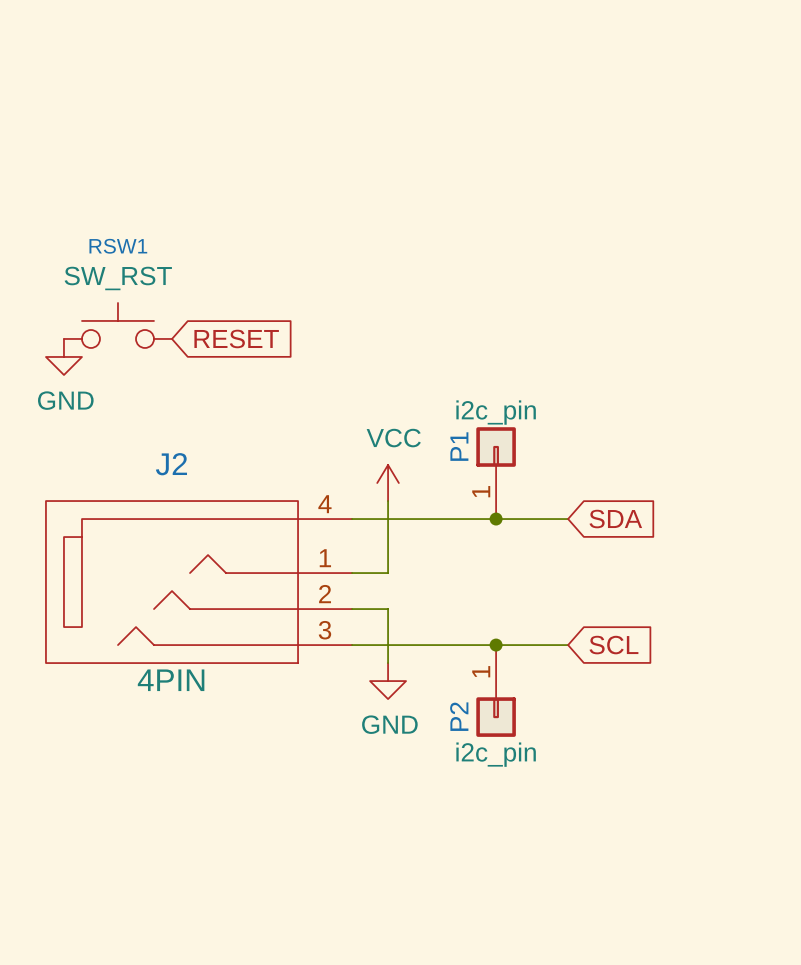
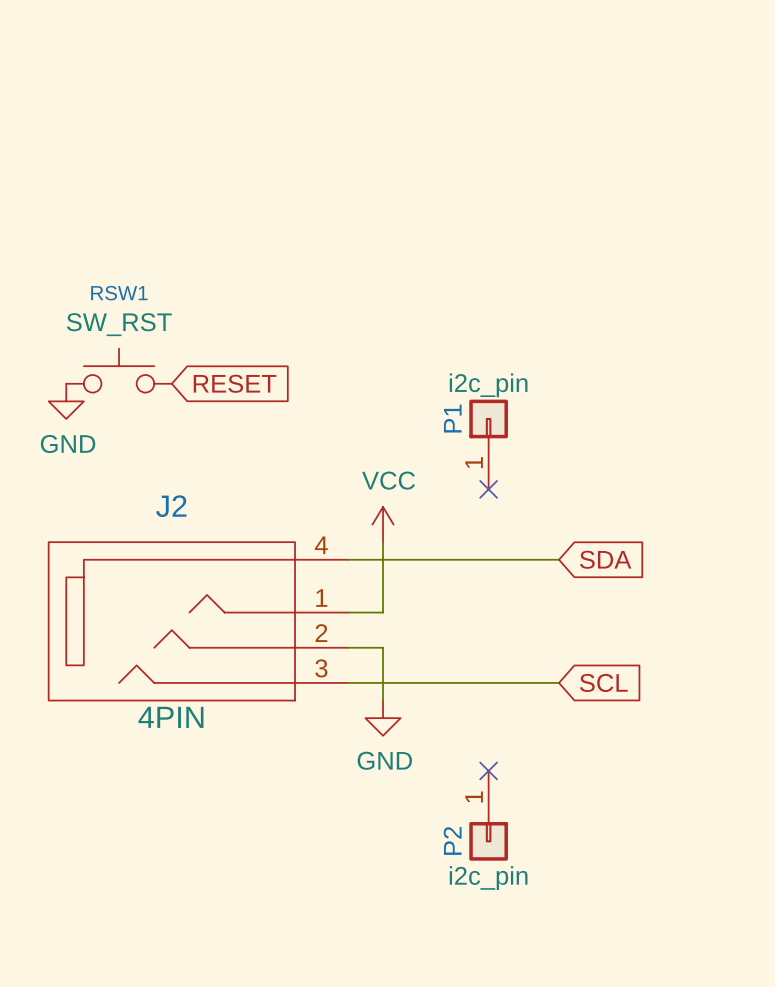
no-connect mark: none -> (488, 489)
P1 position: (496, 473) -> (488, 444)
junction: (496, 519) -> none
junction: (496, 645) -> none
P2 position: (496, 690) -> (488, 815)
no-connect mark: none -> (488, 770)

